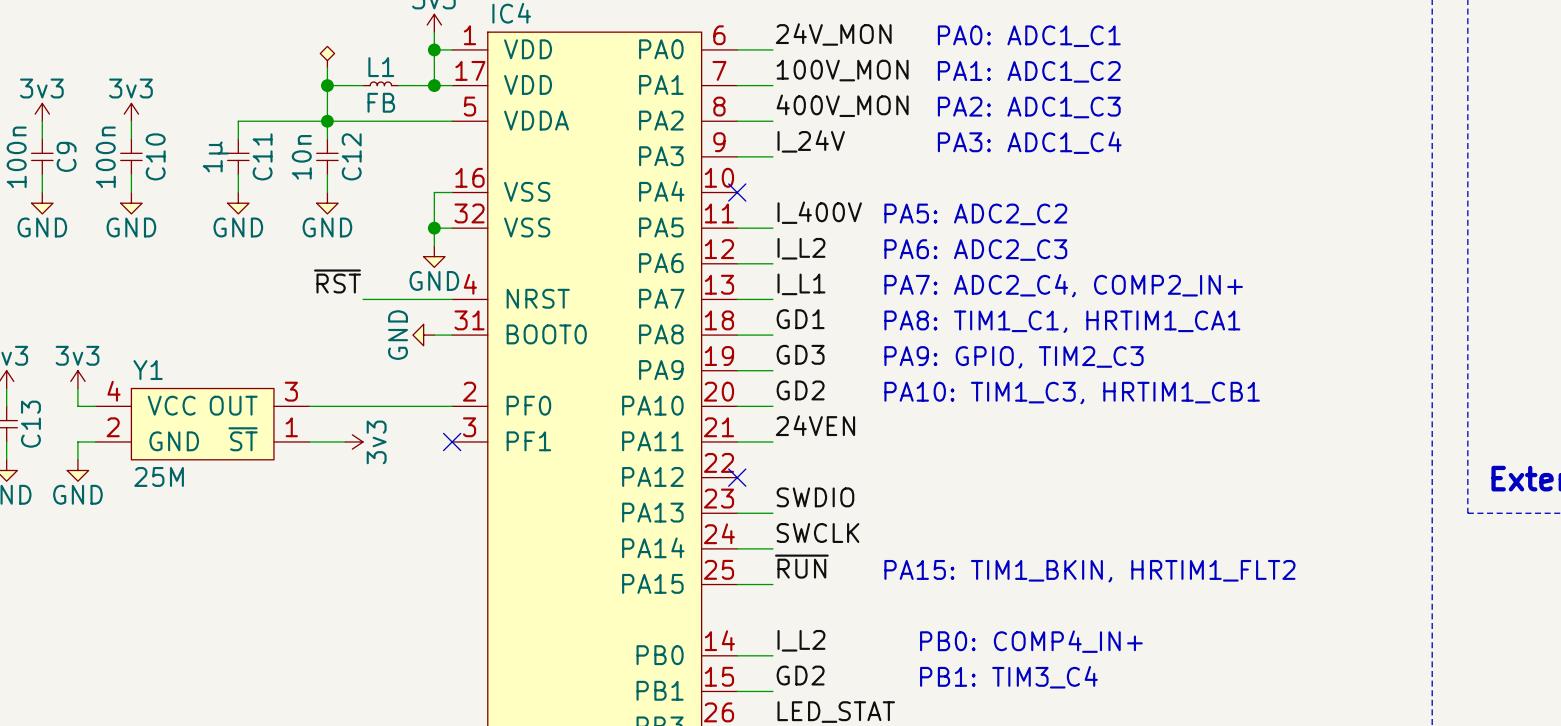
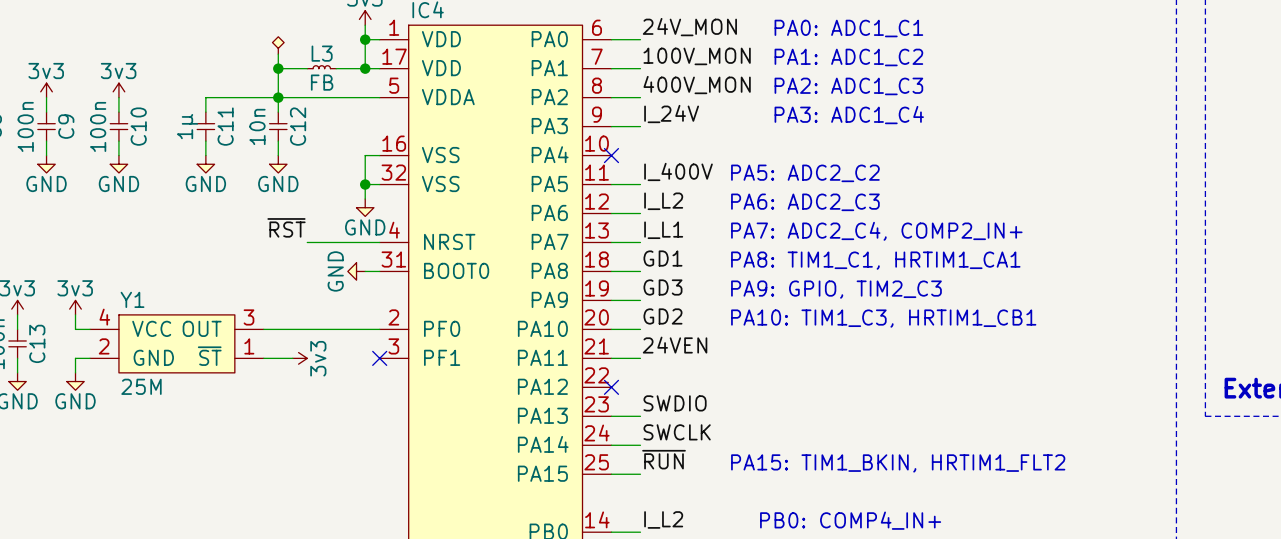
L1 name: L1 (381, 67) -> L3 (322, 53)

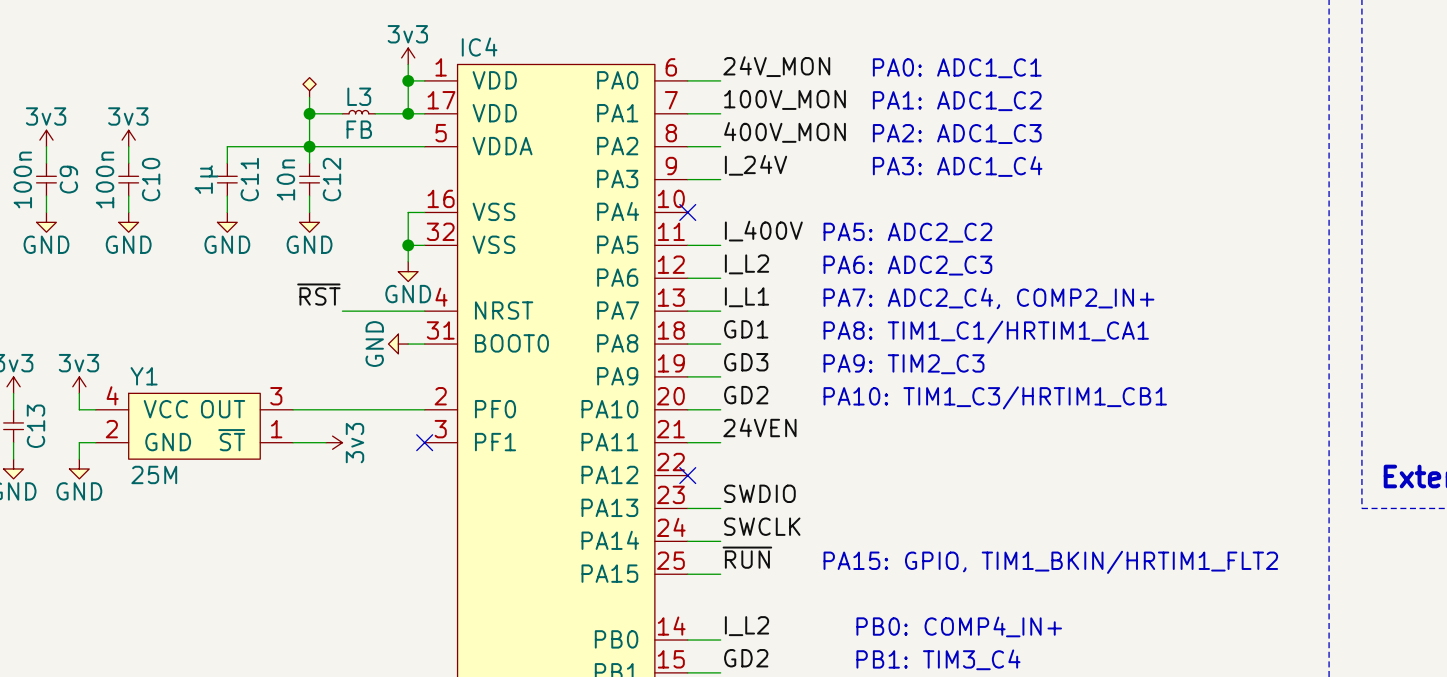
text: PA8: TIM1_C1, HRTIM1_CA1 (875, 260) -> PA8: TIM1_C1/HRTIM1_CA1 (986, 332)
text: PA9: GPIO, TIM2_C3 (836, 289) -> PA9: TIM2_C3 (904, 364)
text: PA10: TIM1_C3, HRTIM1_CB1 (883, 318) -> PA10: TIM1_C3/HRTIM1_CB1 (995, 397)
text: PA15: TIM1_BKIN, HRTIM1_FLT2 (898, 463) -> PA15: GPIO, TIM1_BKIN/HRTIM1_FLT2 (1050, 562)

